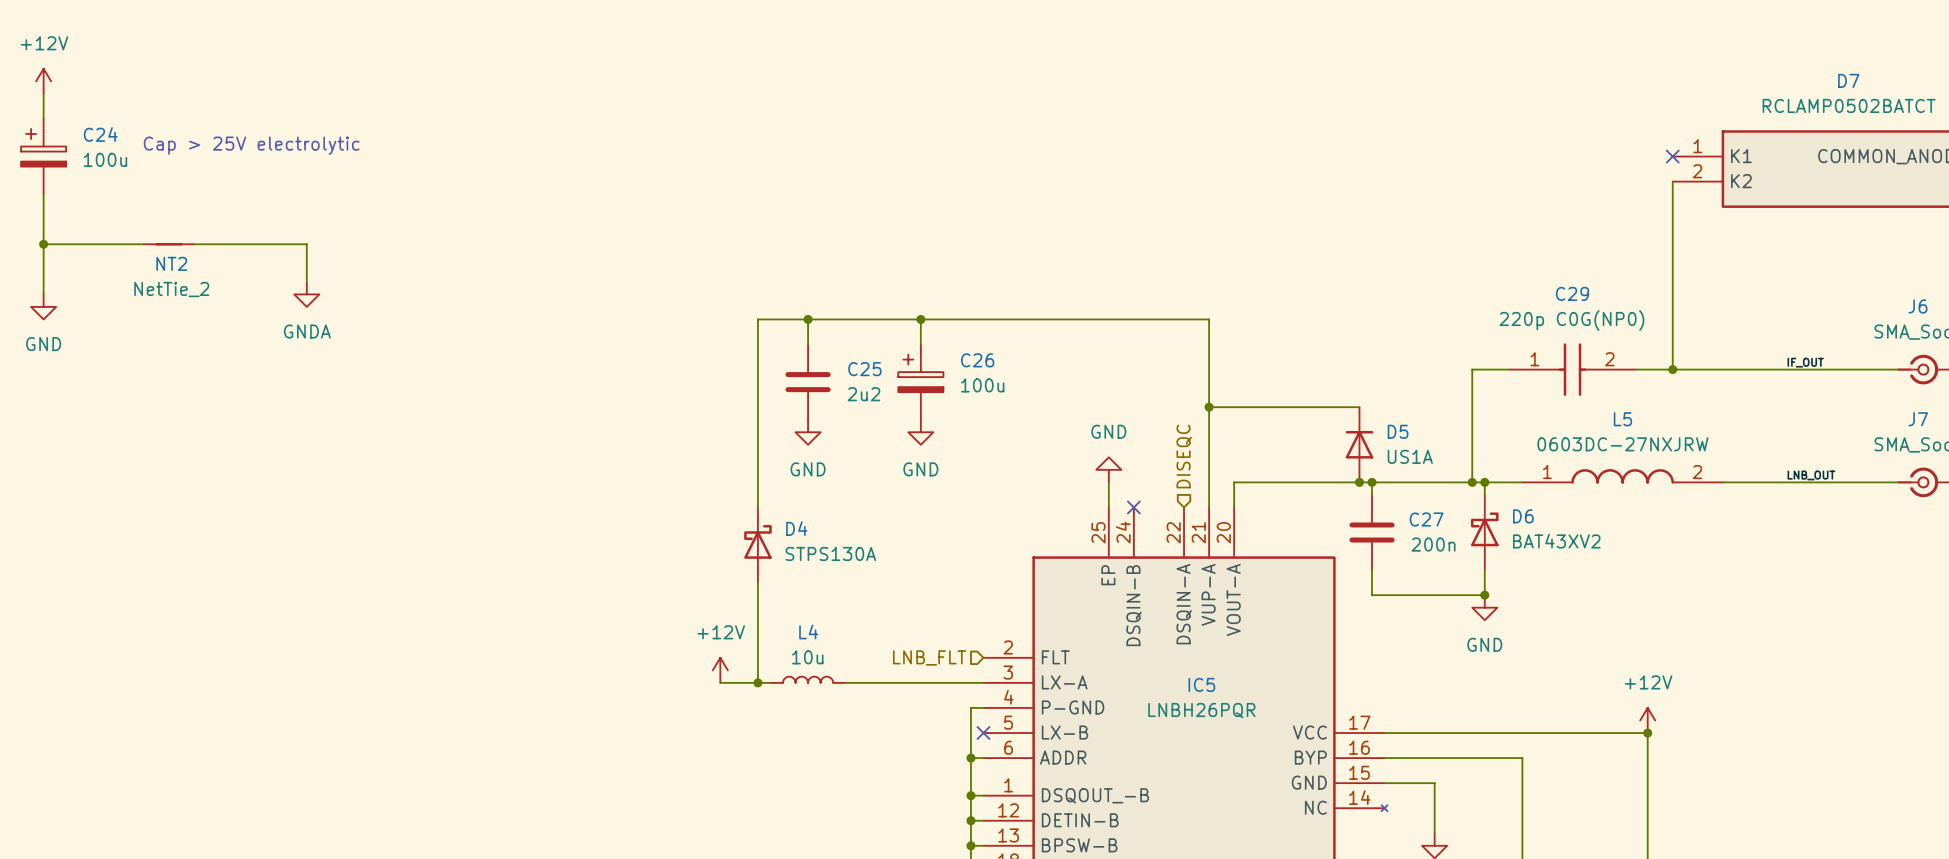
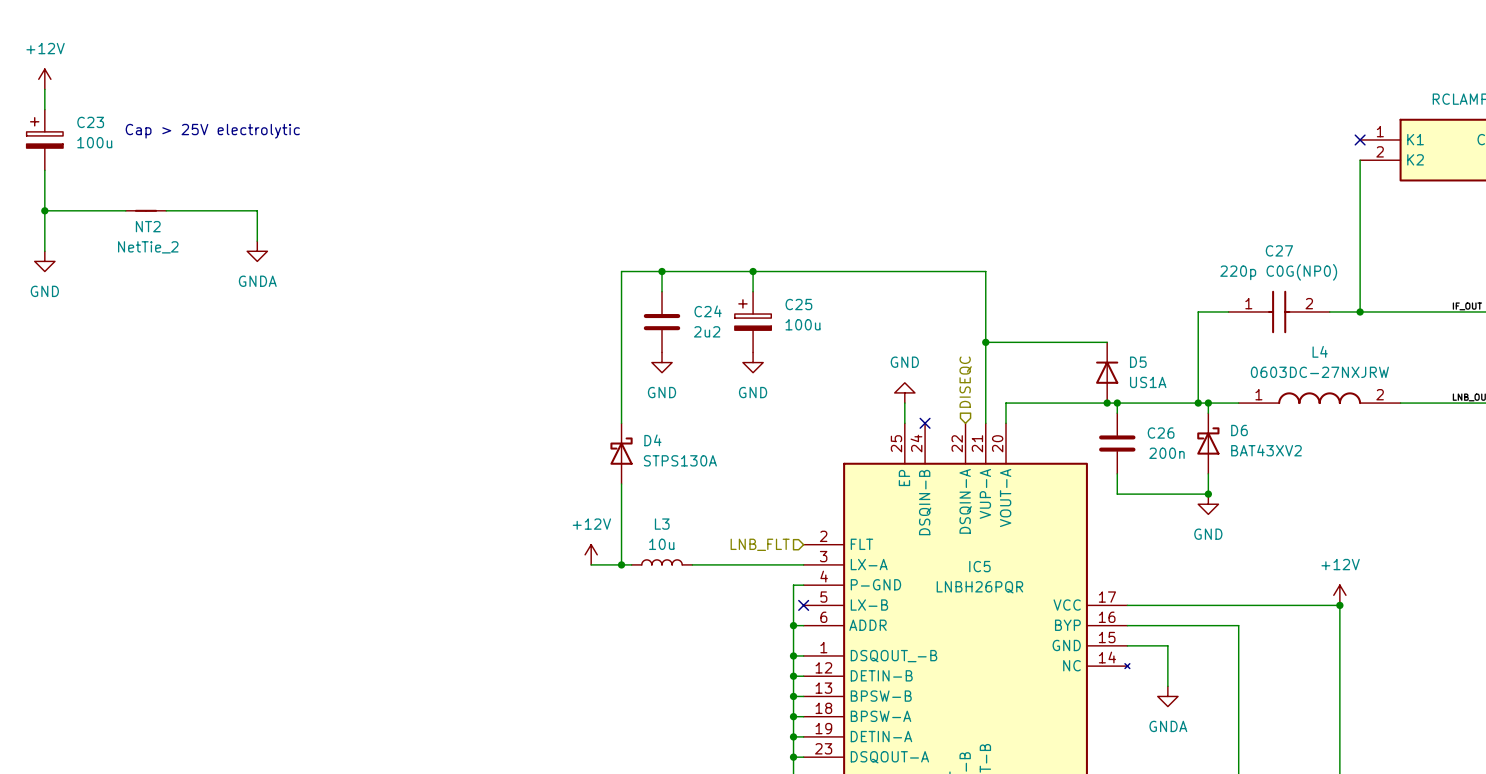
C24 name: C24 (100, 134) -> C23 (90, 122)
C29 name: C29 (1572, 293) -> C27 (1279, 250)
C26 name: C26 (977, 360) -> C25 (798, 304)
C25 name: C25 (864, 369) -> C24 (708, 311)
L5 name: L5 (1622, 419) -> L4 (1320, 351)
C27 name: C27 (1426, 519) -> C26 (1161, 433)
L4 name: L4 (808, 631) -> L3 (662, 524)

